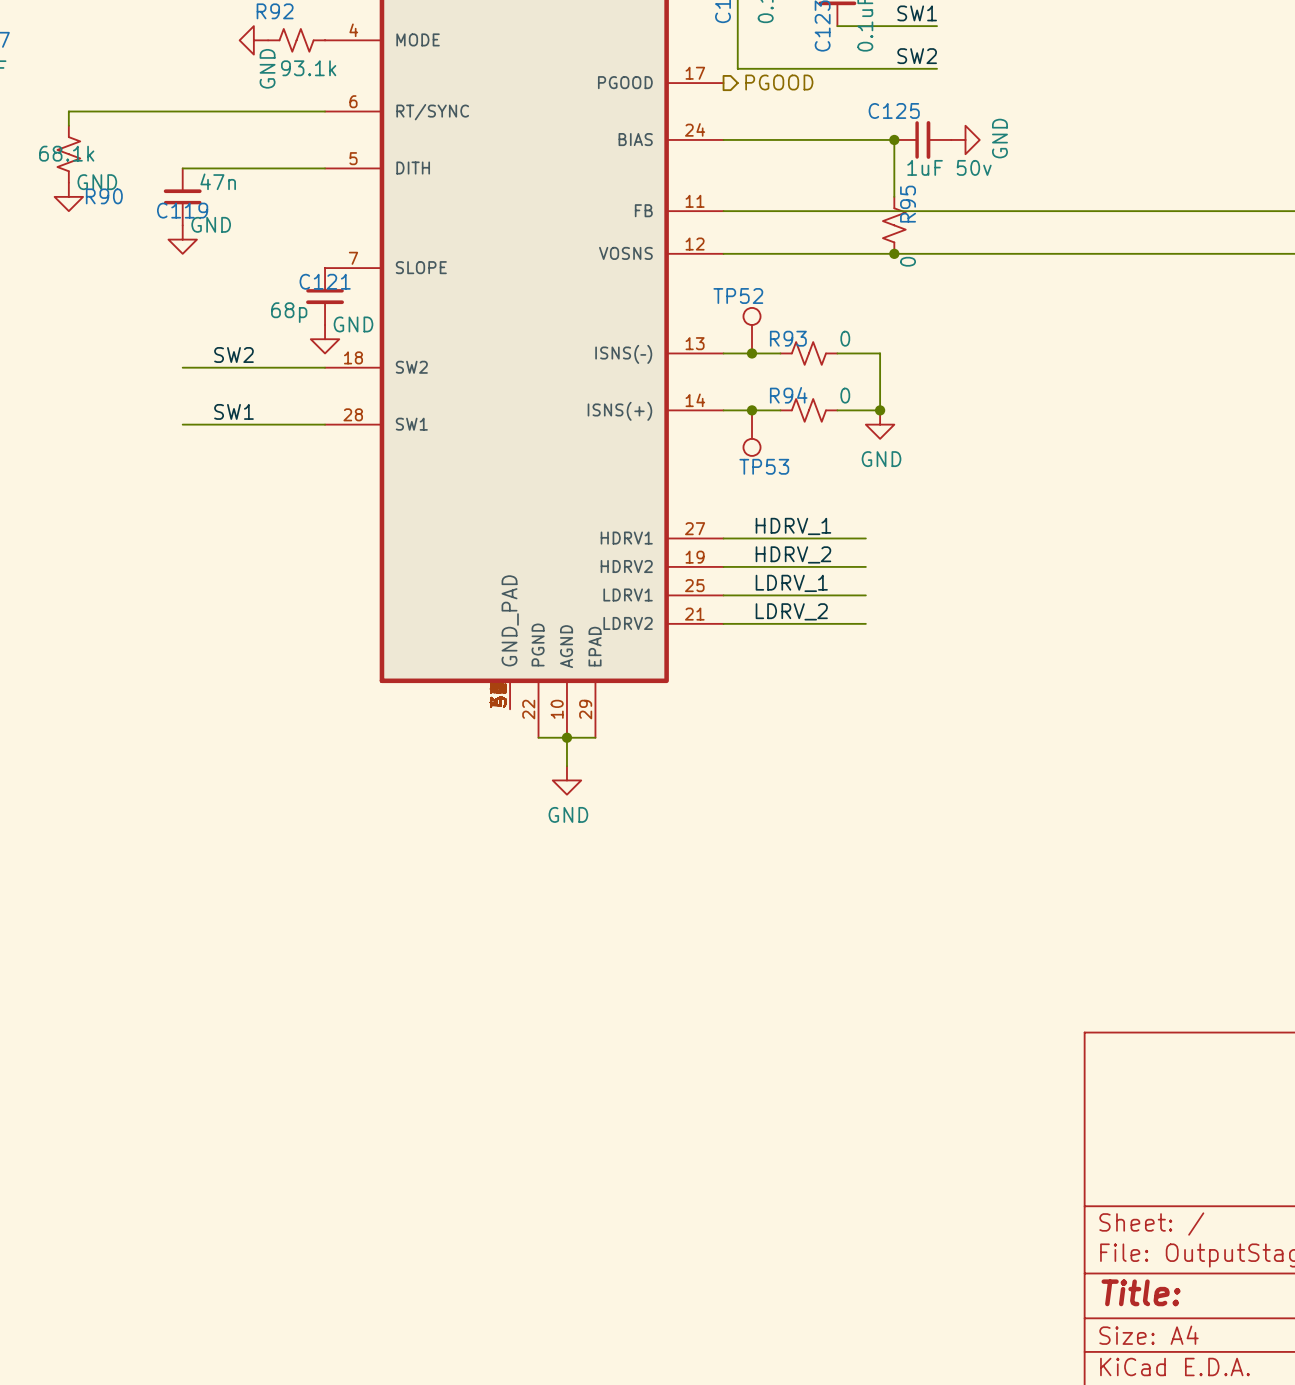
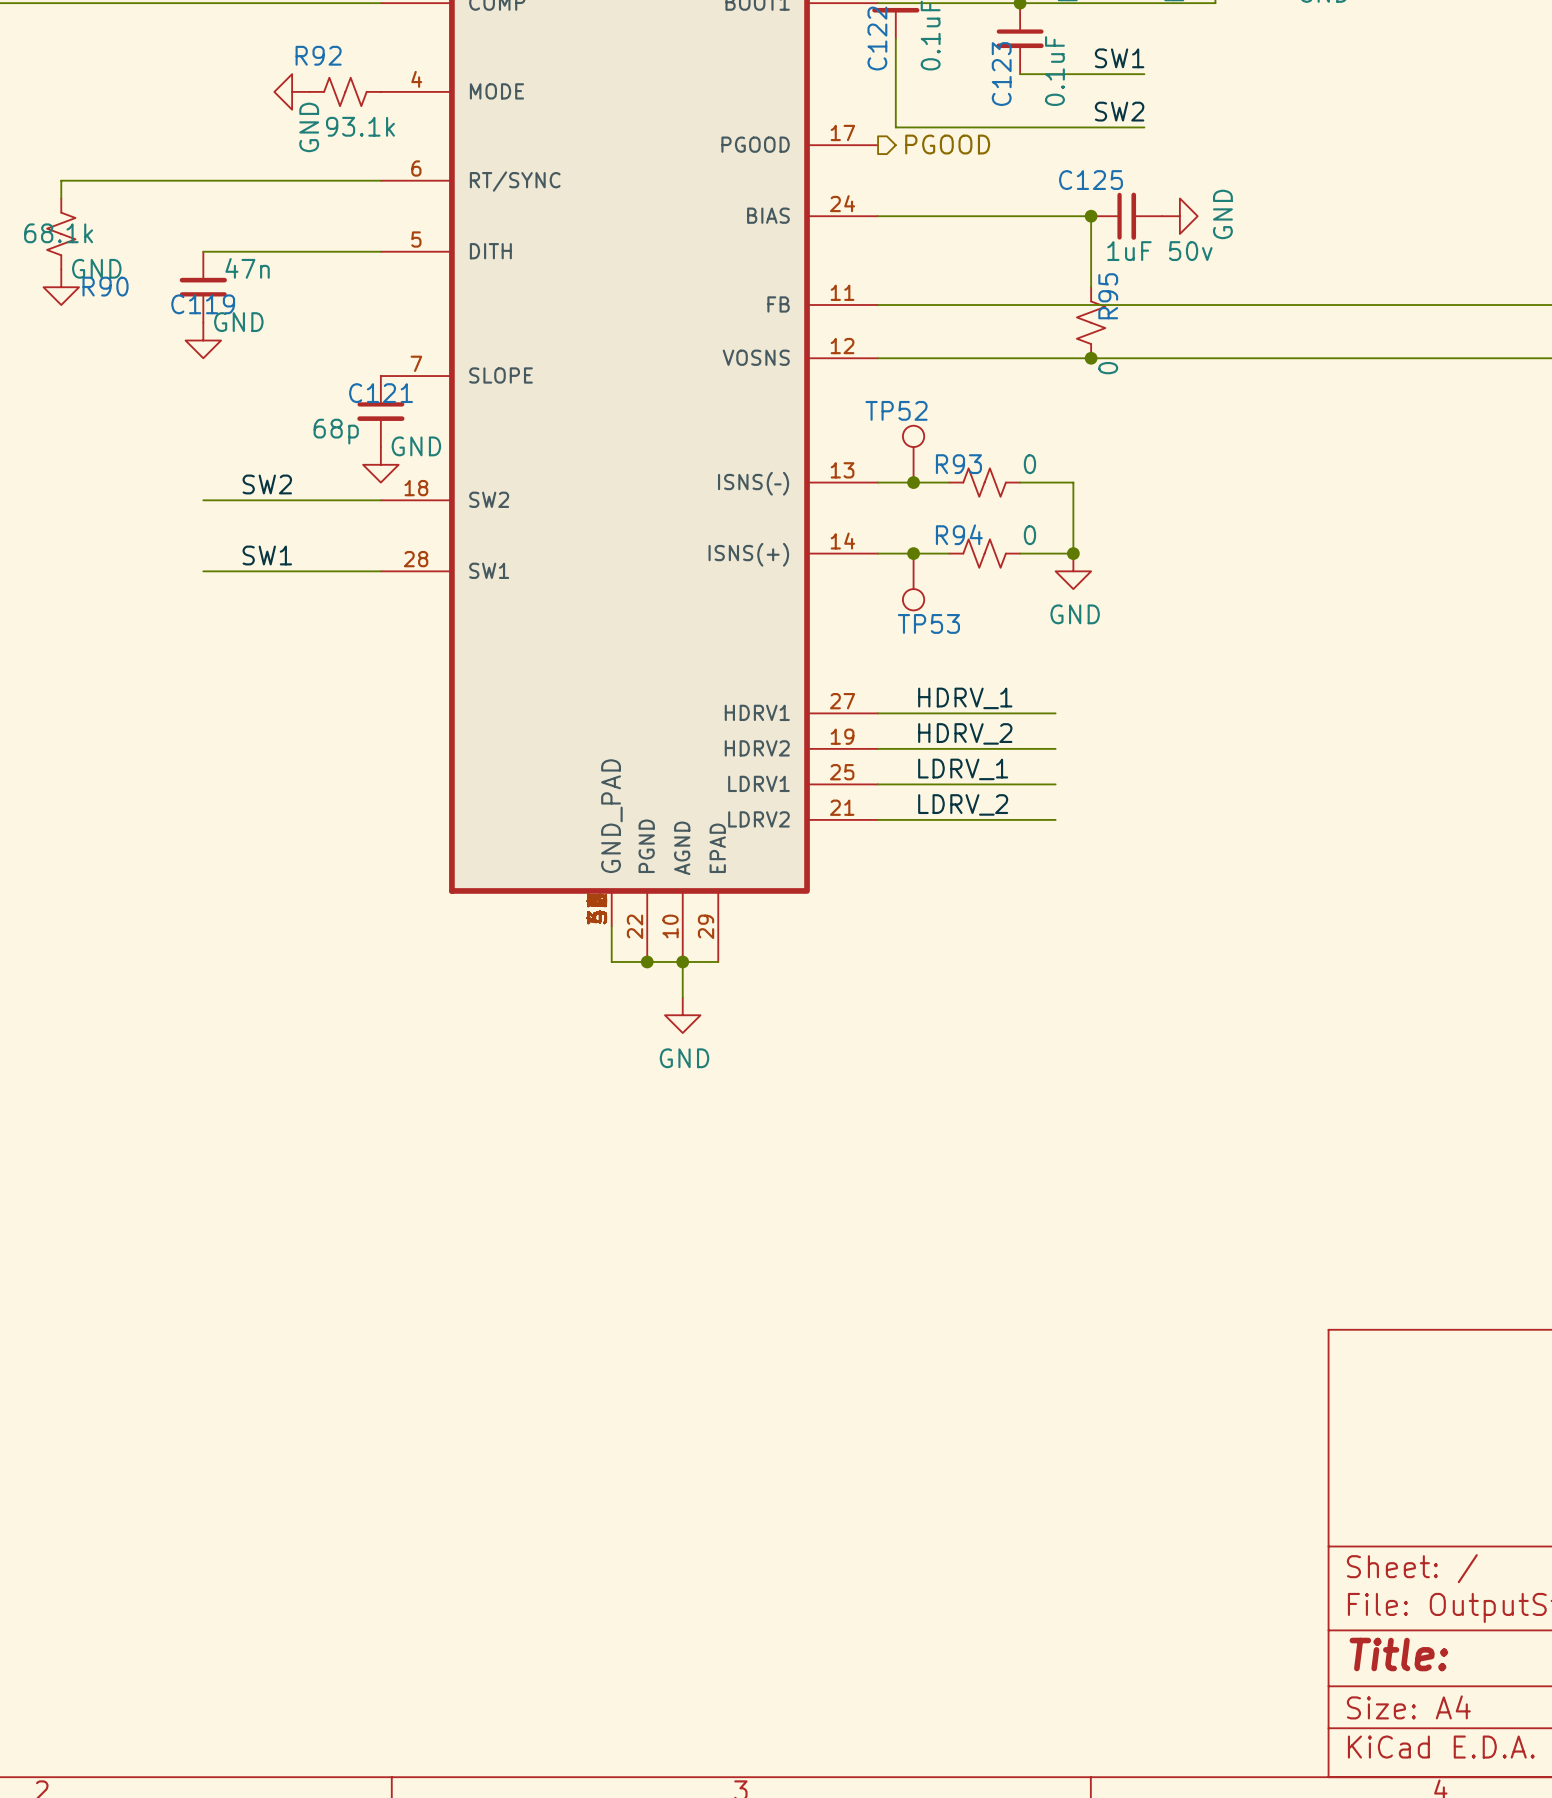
wire: none -> (611, 926) (611, 961) (647, 961)
junction: none -> (647, 961)

